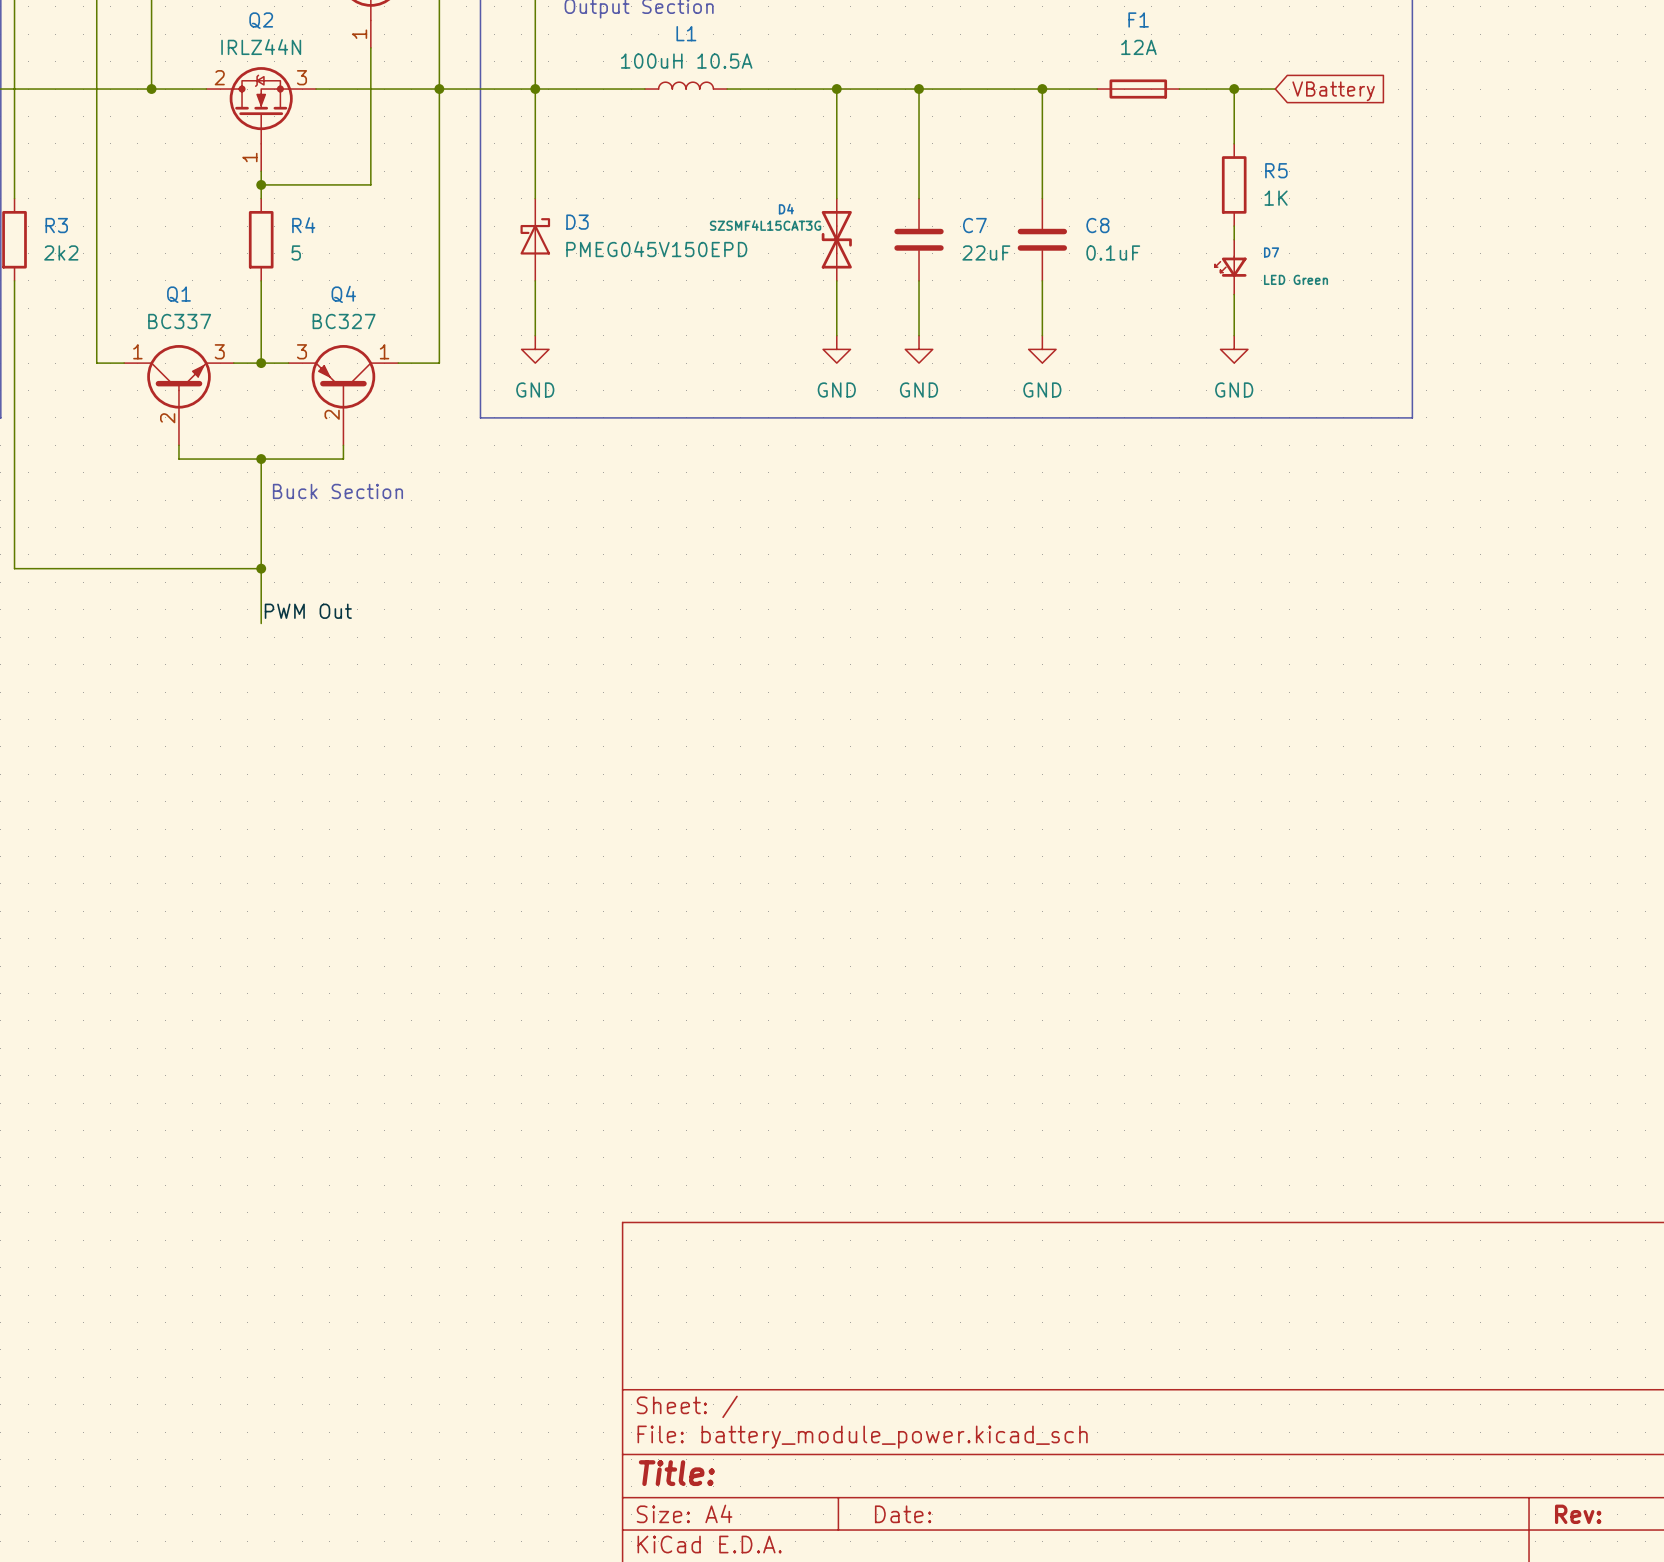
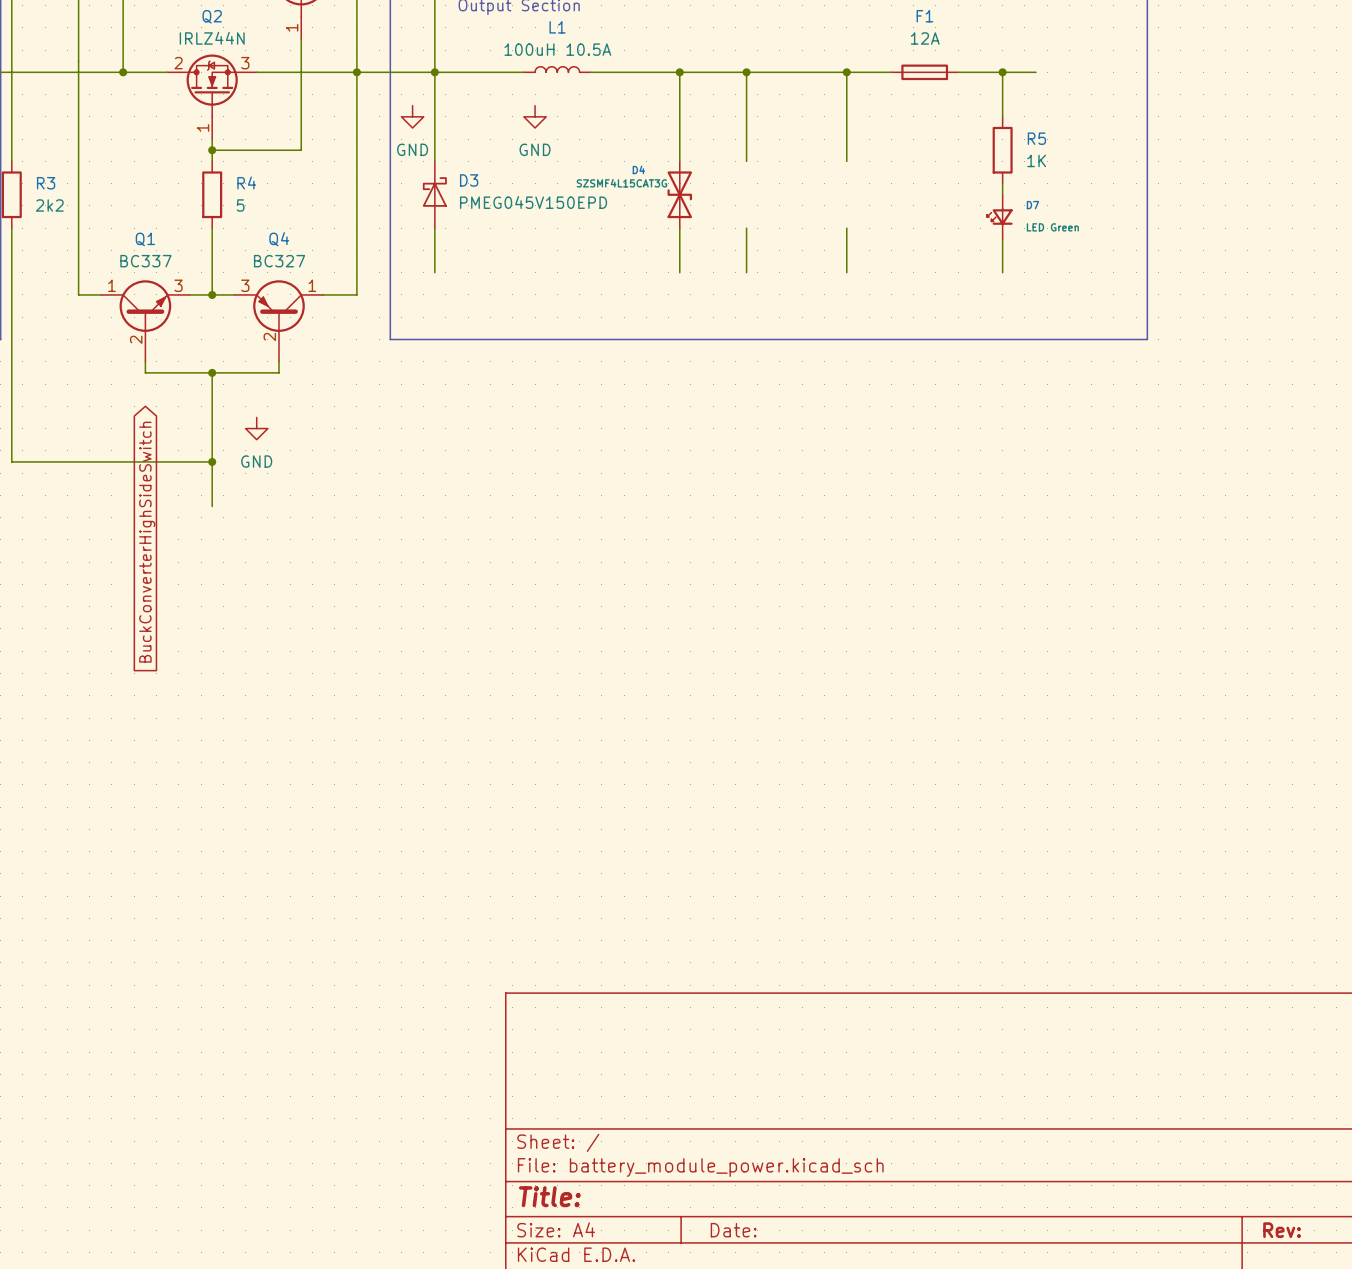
global label: VBattery (1333, 91) -> none
power symbol: none -> GND (412, 116)
power symbol: none -> GND (535, 116)
C7: 22uF (919, 239) -> none
C8: 0.1uF (1042, 239) -> none
power symbol: GND (535, 349) -> none
power symbol: GND (836, 349) -> none
power symbol: GND (919, 349) -> none
power symbol: GND (1042, 349) -> none
power symbol: GND (1234, 349) -> none
text: Buck Section (337, 491) -> none
power symbol: none -> GND (256, 428)
label: PWM Out (308, 611) -> none
global label: none -> BuckConverterHighSideSwitch (147, 542)

